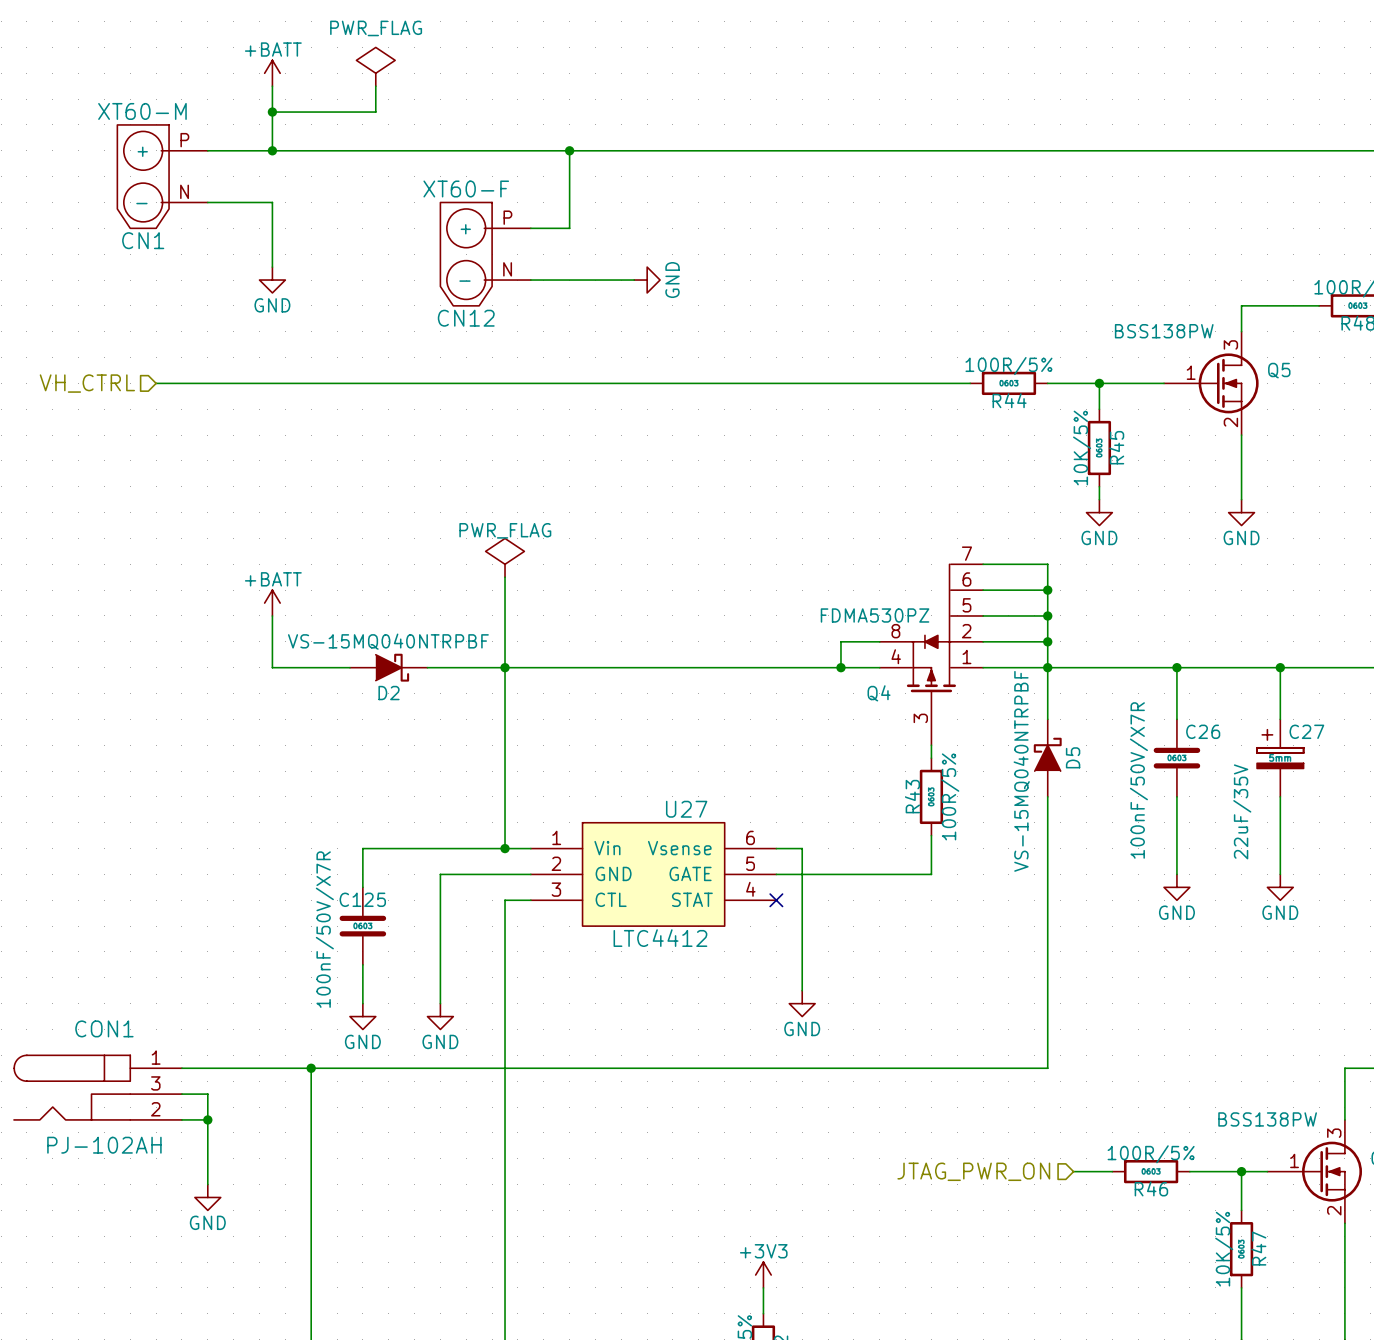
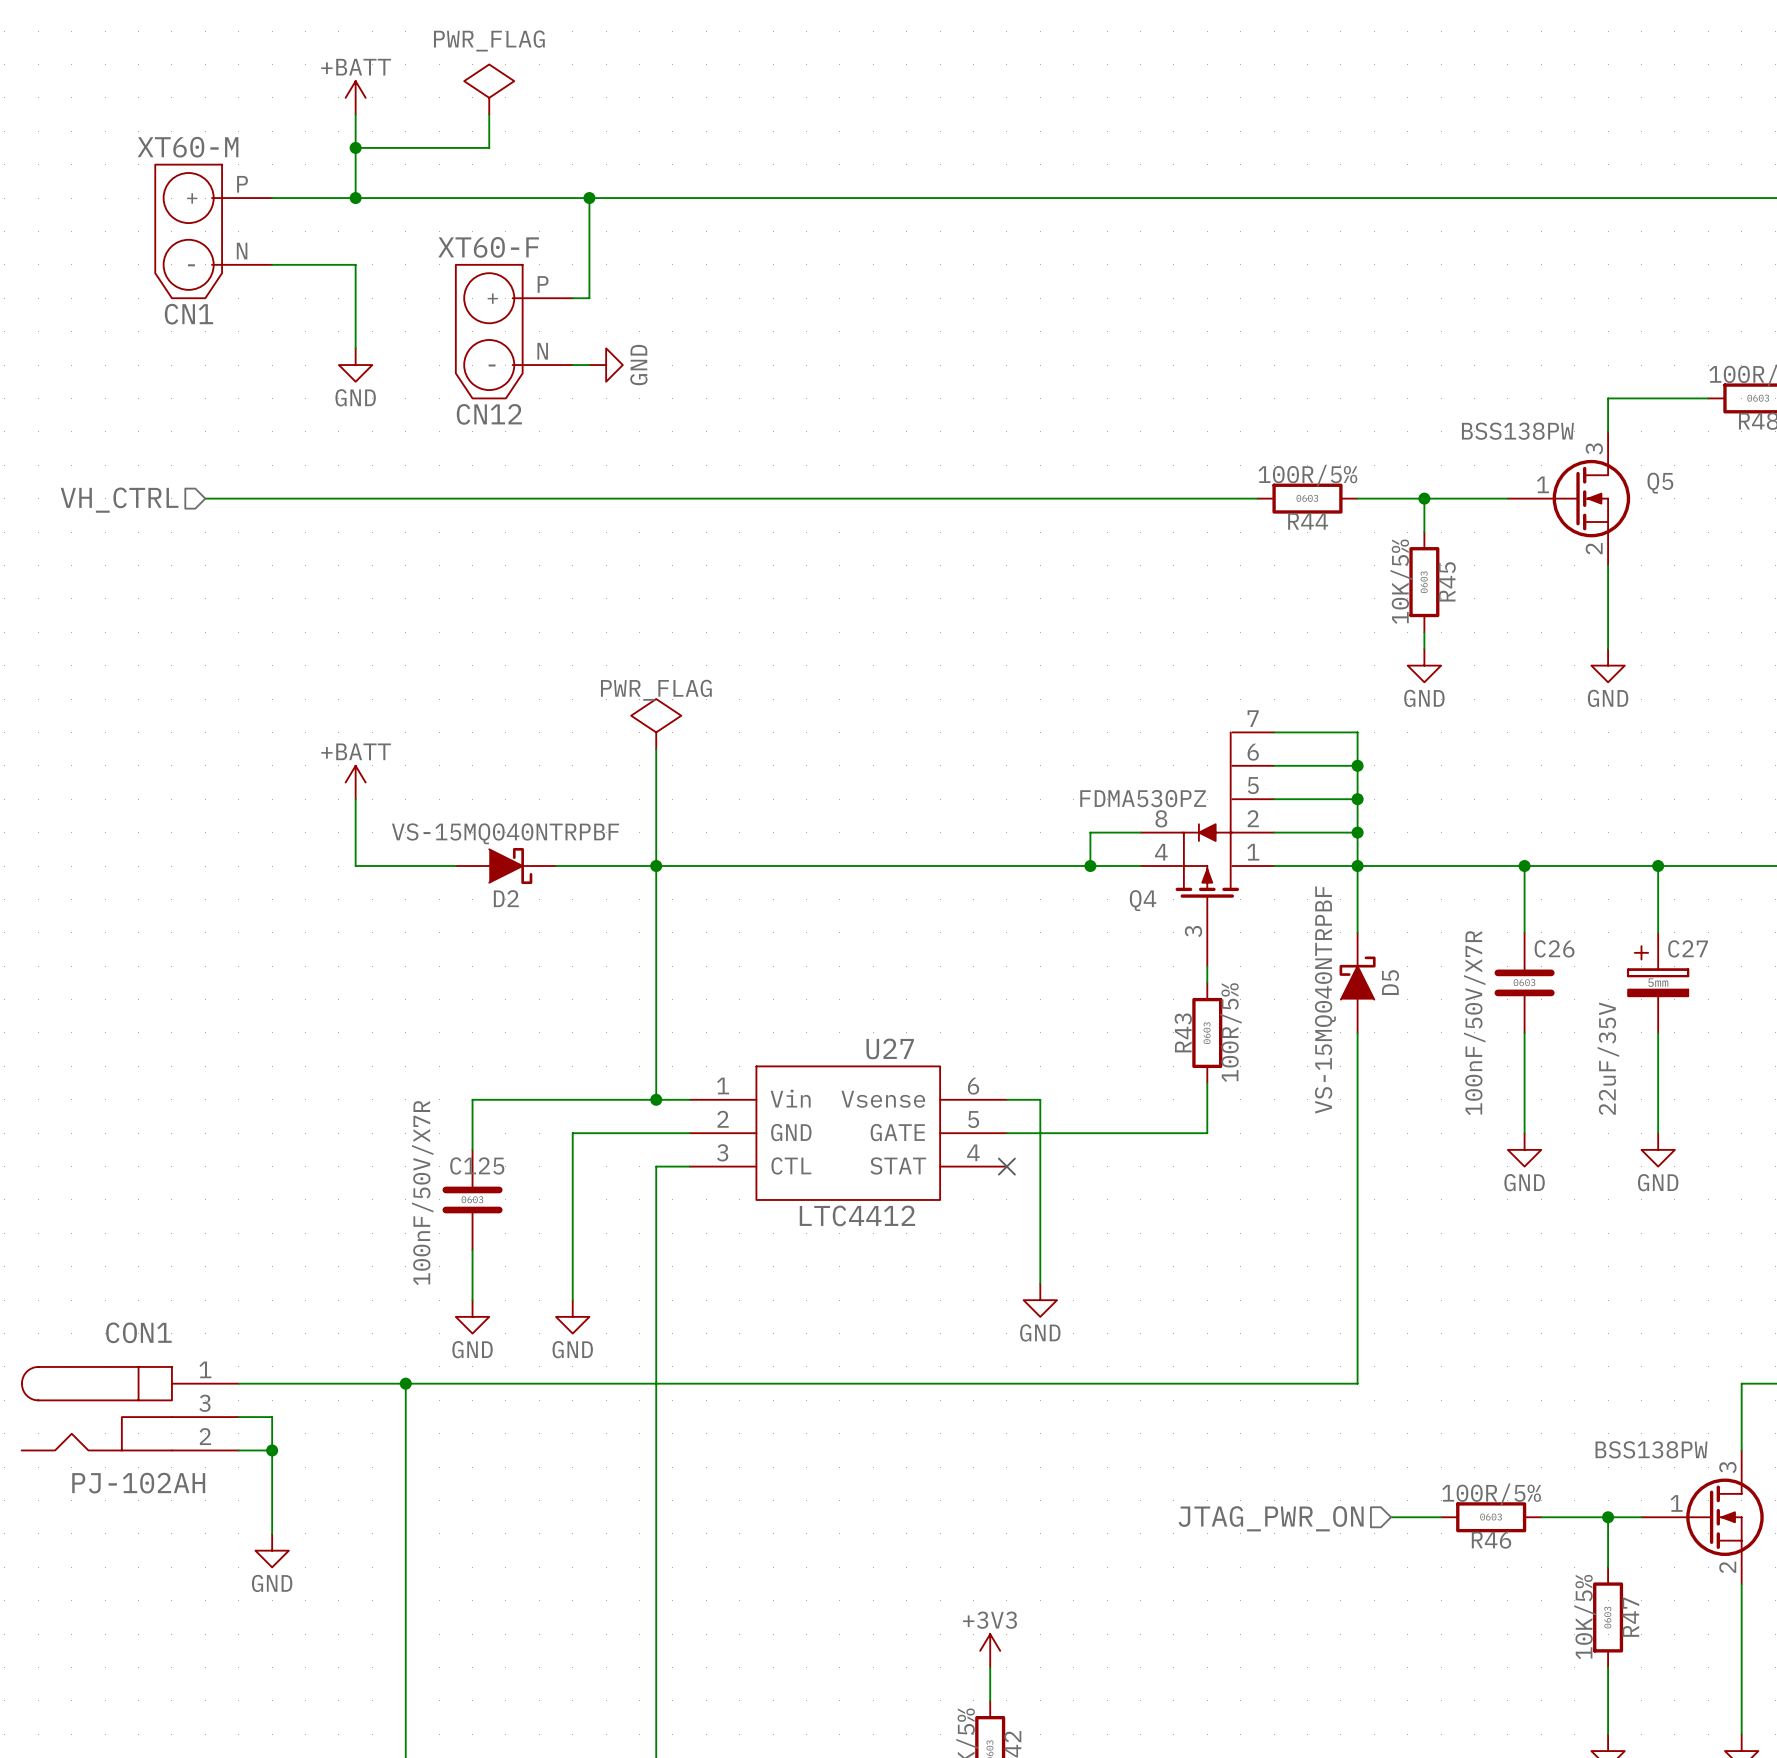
wire: none -> (589, 198) (589, 298) (572, 298)
junction: none -> (589, 198)
wire: (569, 150) (569, 228) (530, 228) -> none
junction: (569, 150) -> none
CN12 position: (485, 254) -> (514, 331)
wire: none -> (572, 365) (589, 365)
wire: (530, 280) (634, 280) -> none
power symbol position: GND (647, 280) -> GND (606, 365)

